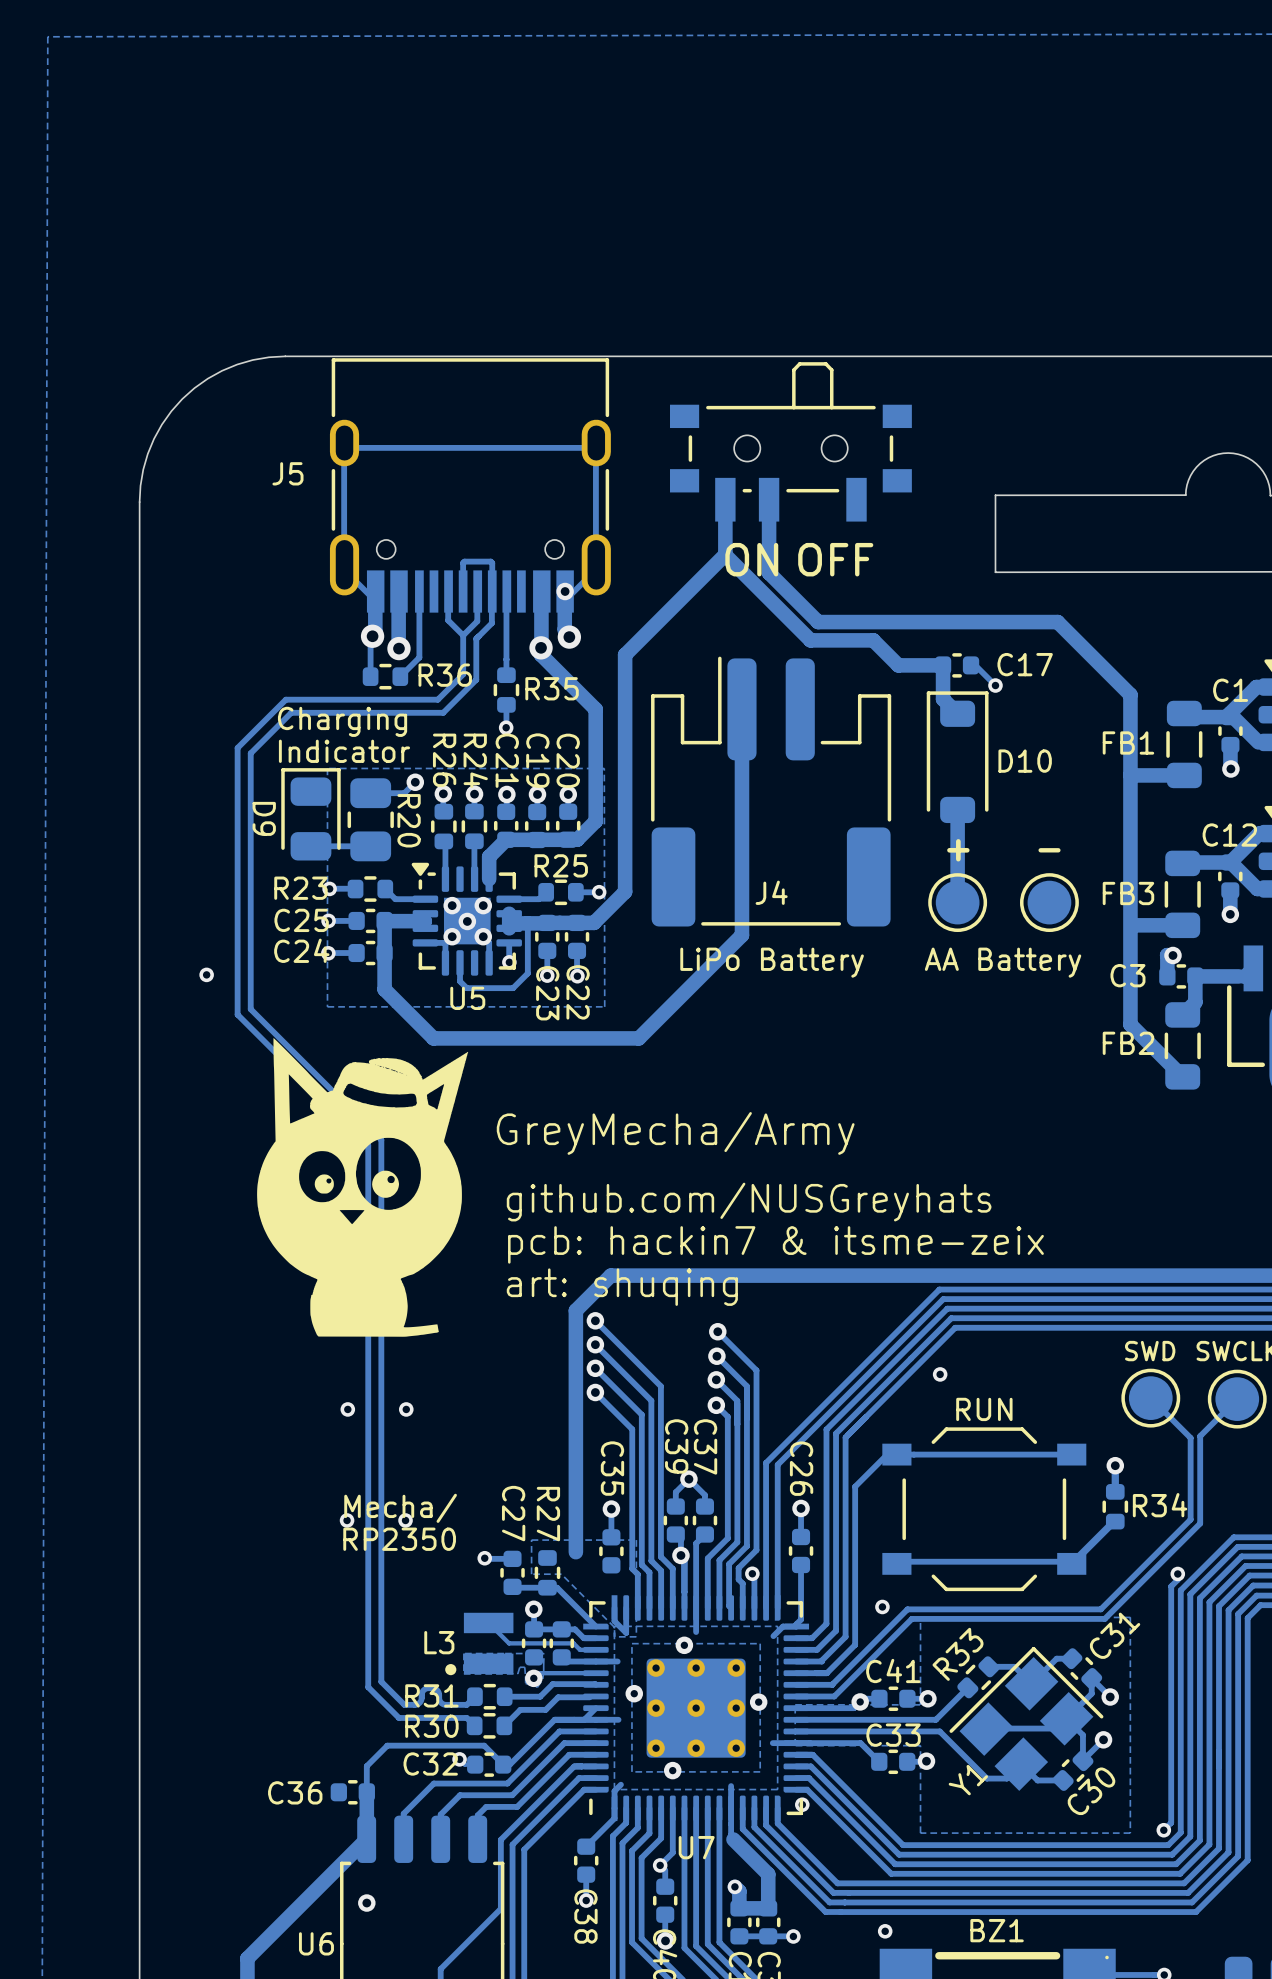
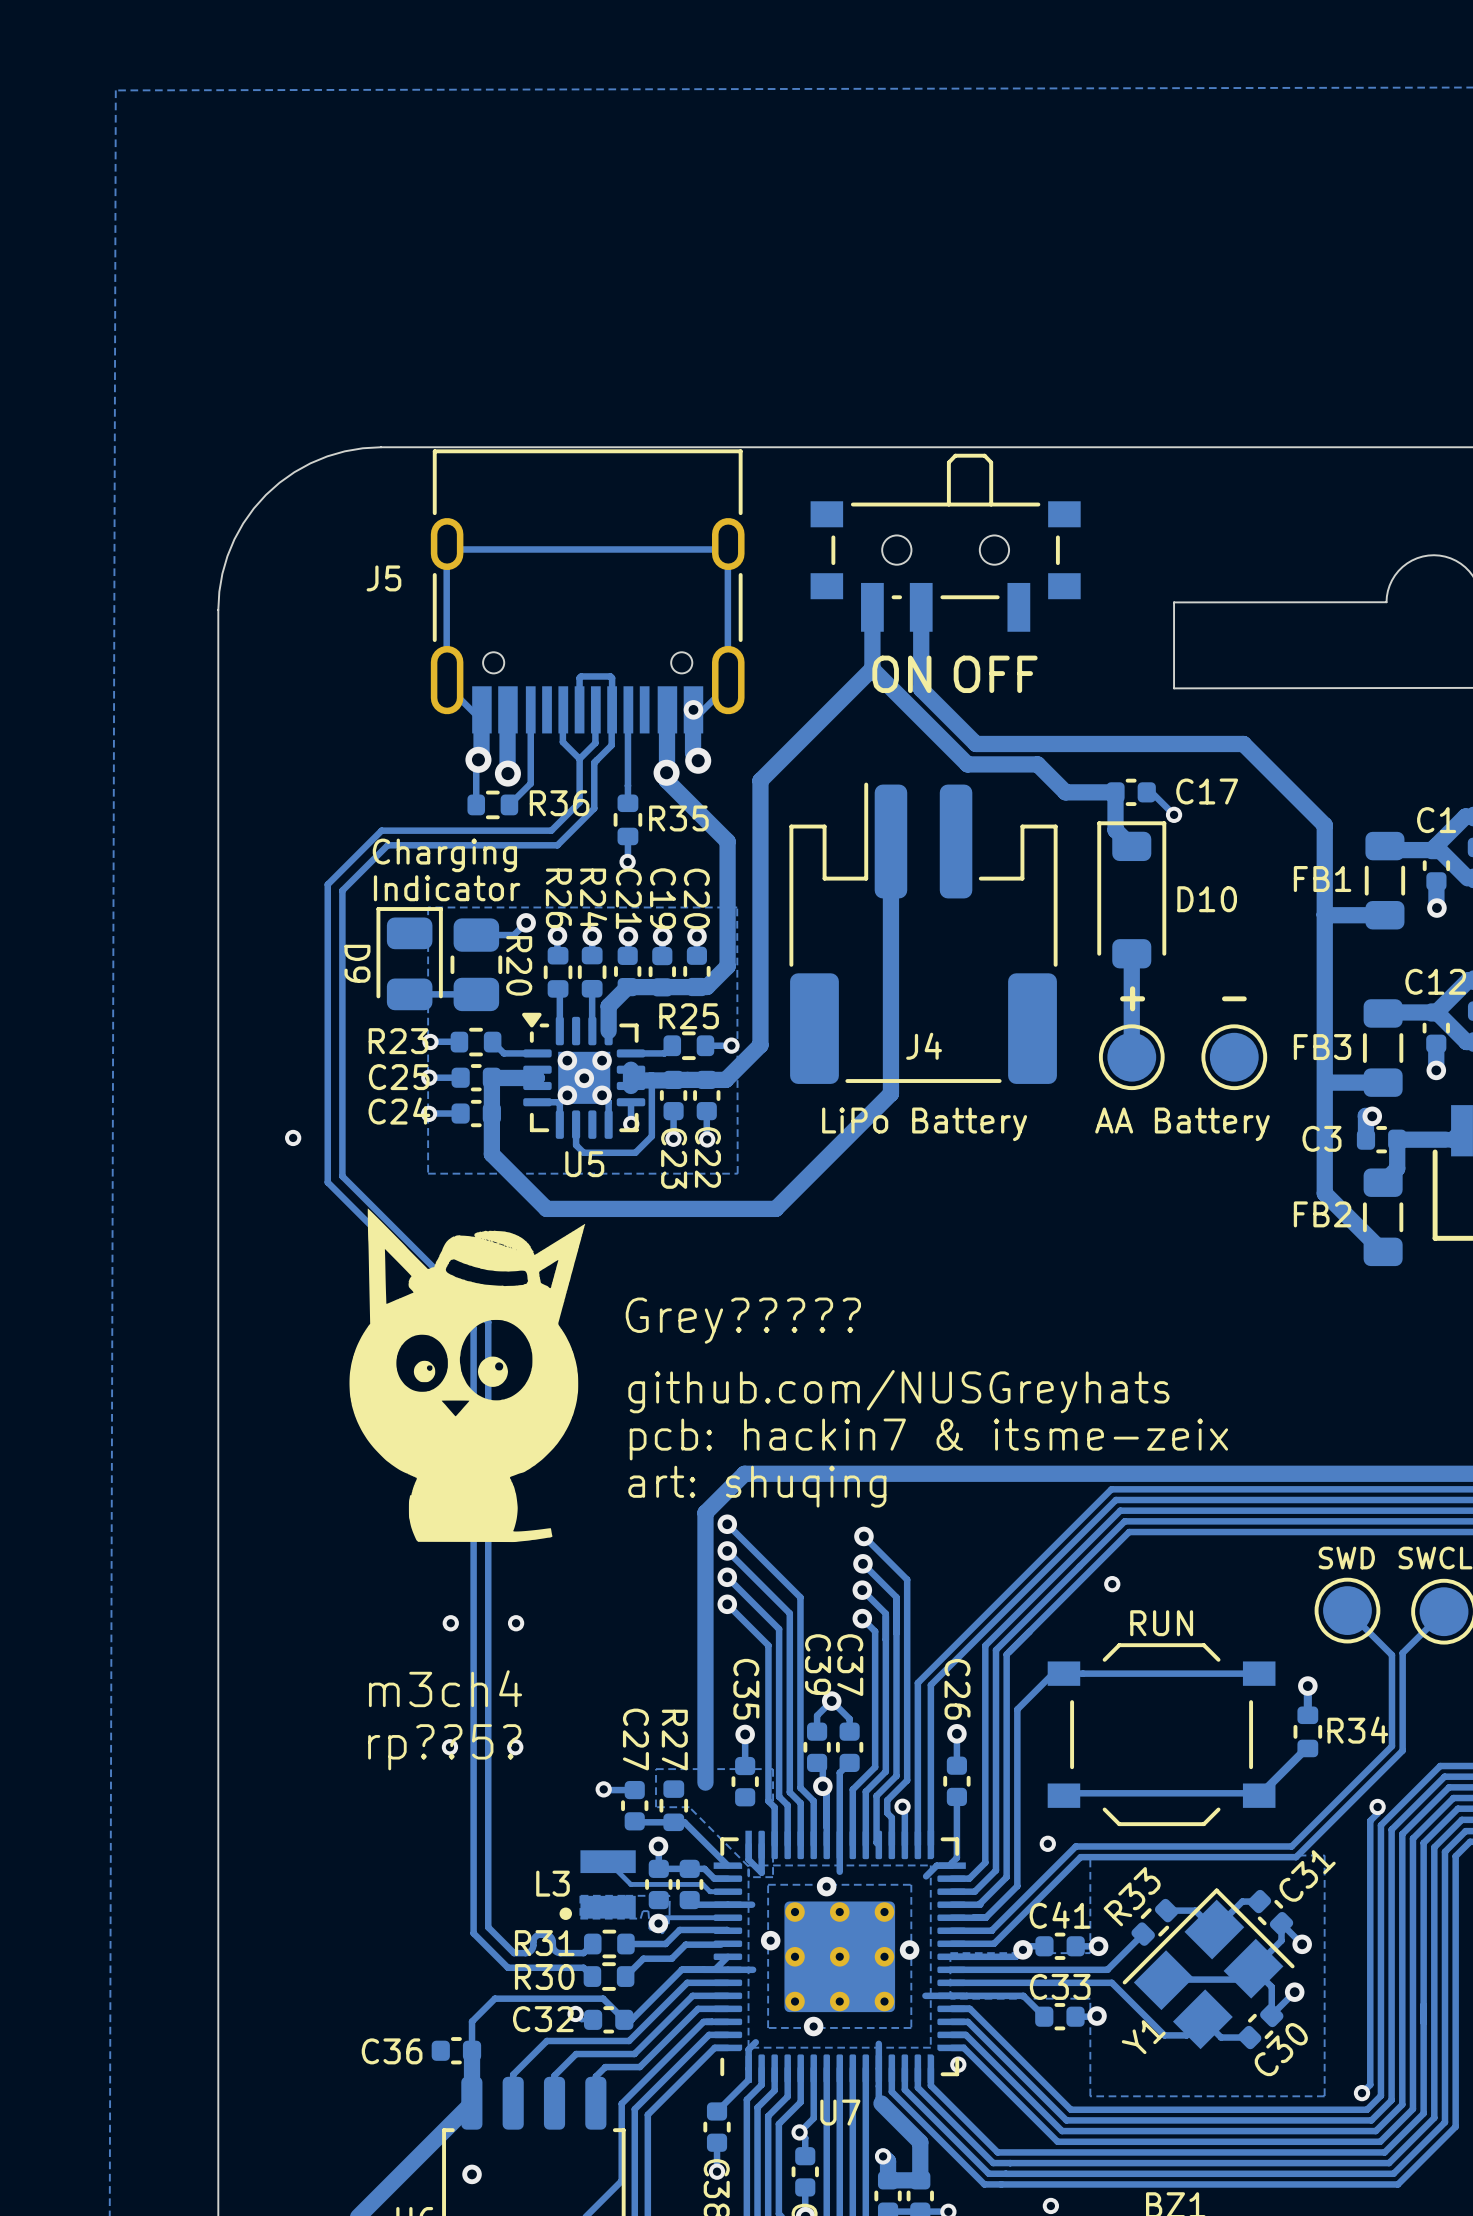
text: GreyMecha/Army (675, 1133) -> none
text: none -> Grey????? (743, 1320)
text: none -> m3ch4 (445, 1688)
text: Mecha/ (400, 1508) -> none
text: none -> rp??5? (444, 1747)
text: RP2350 (399, 1539) -> none

